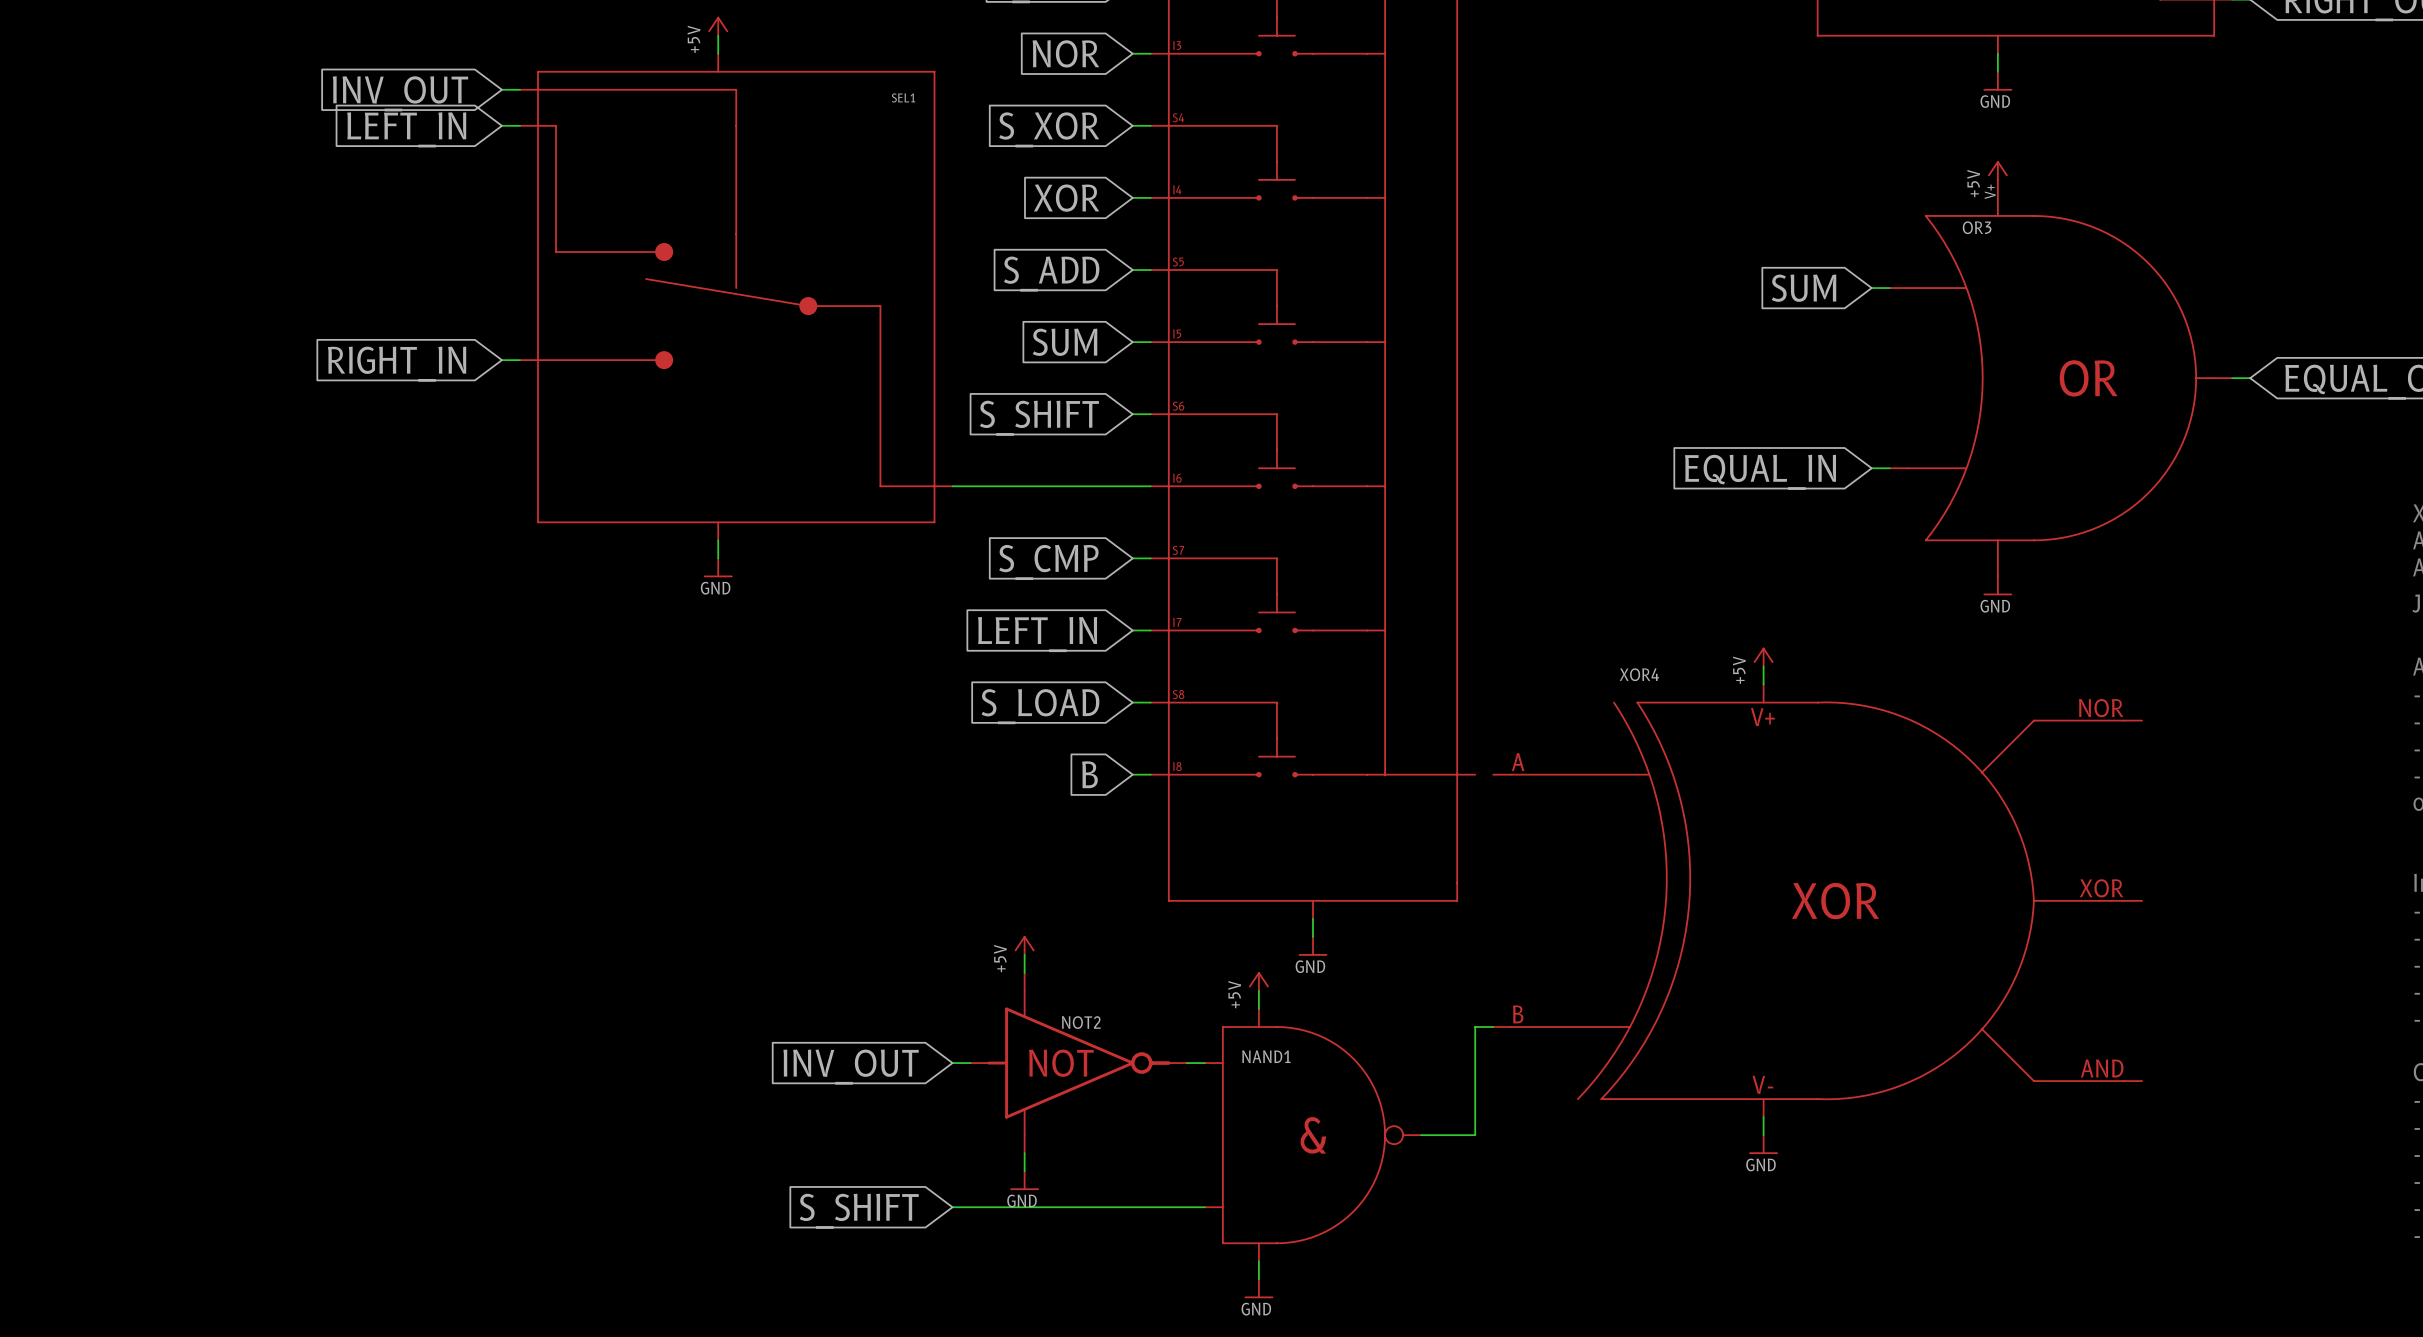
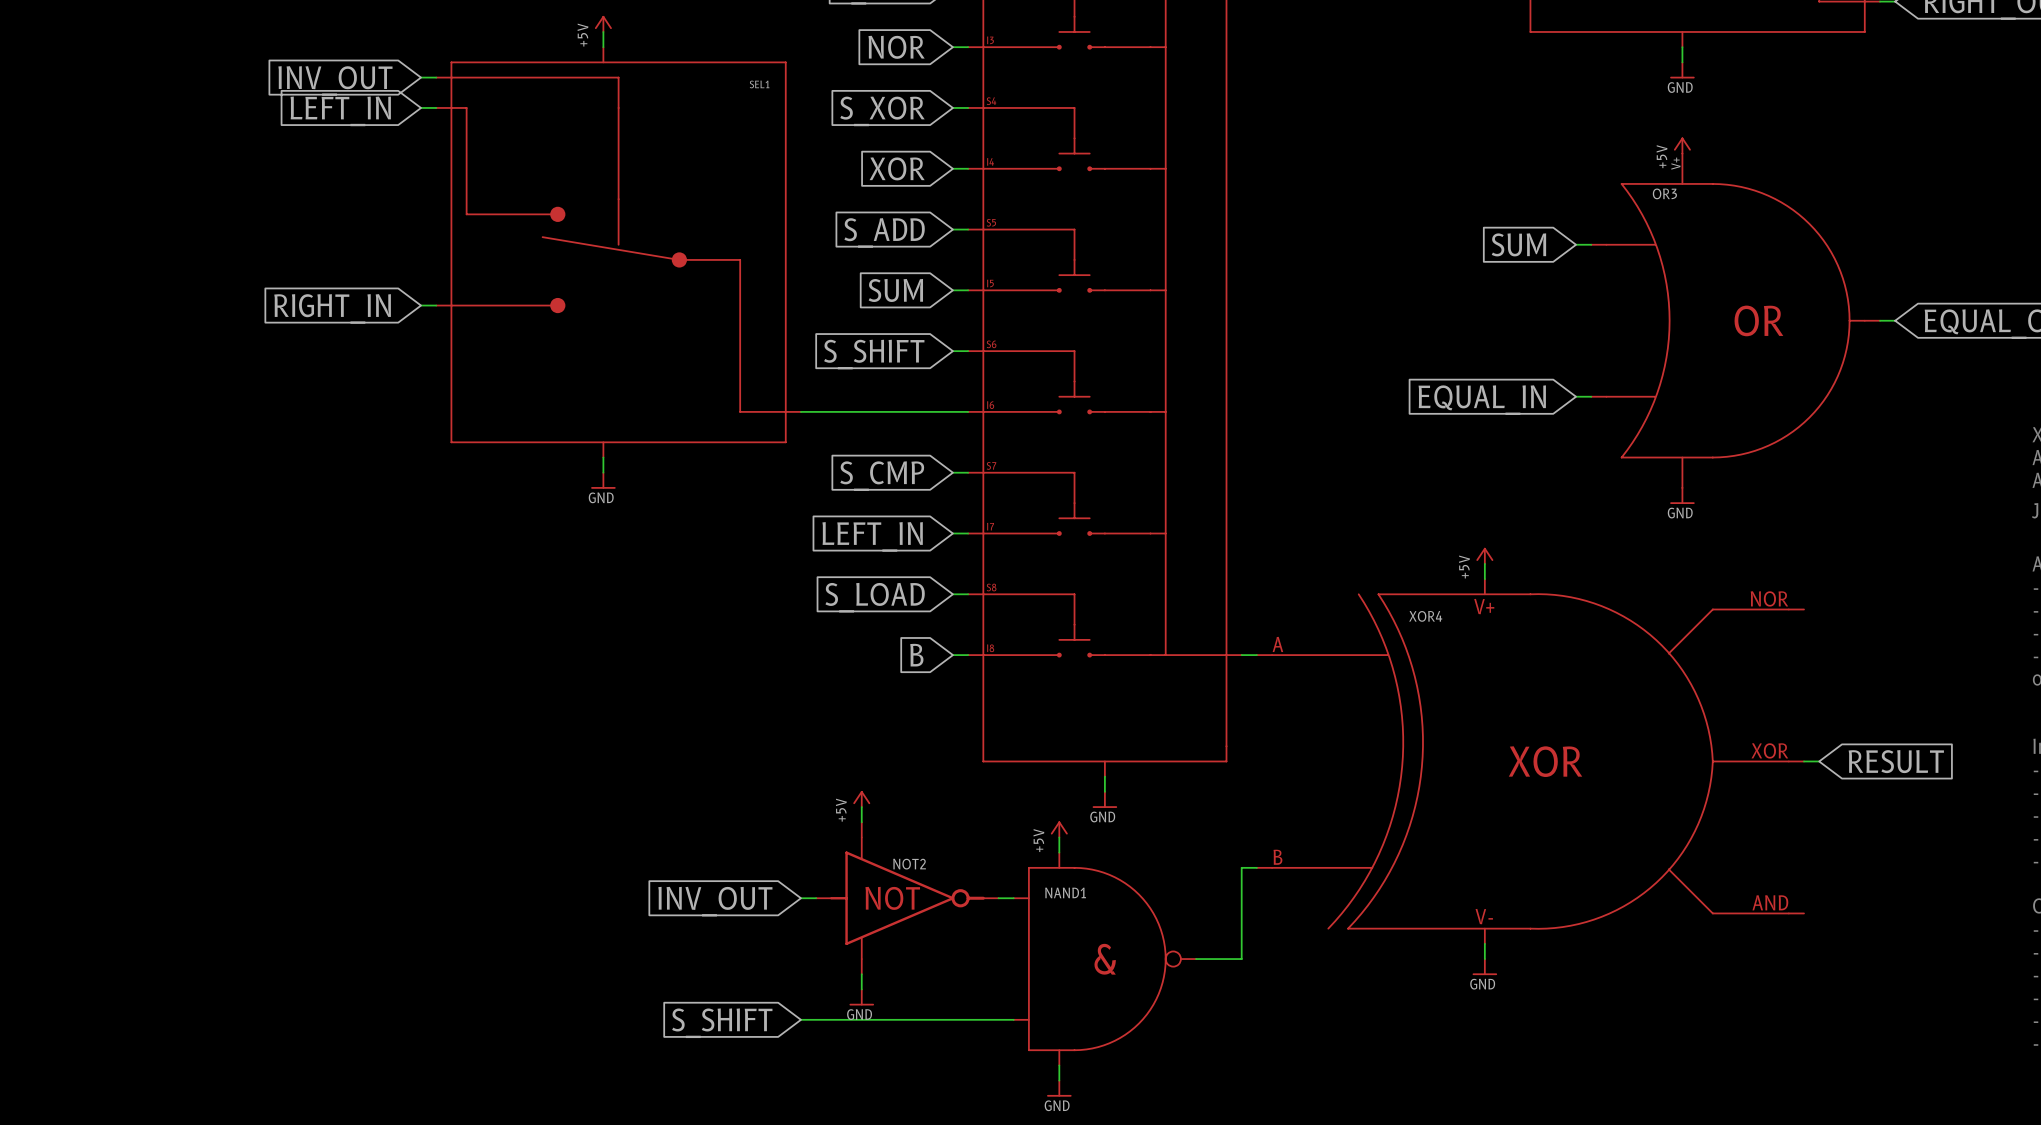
XOR4 name position: XOR4 (1639, 674) -> XOR4 (1425, 616)
wire: none -> (1241, 655) (1256, 655)
wire: none -> (1804, 761) (1819, 761)
global label: none -> RESULT (1896, 761)

